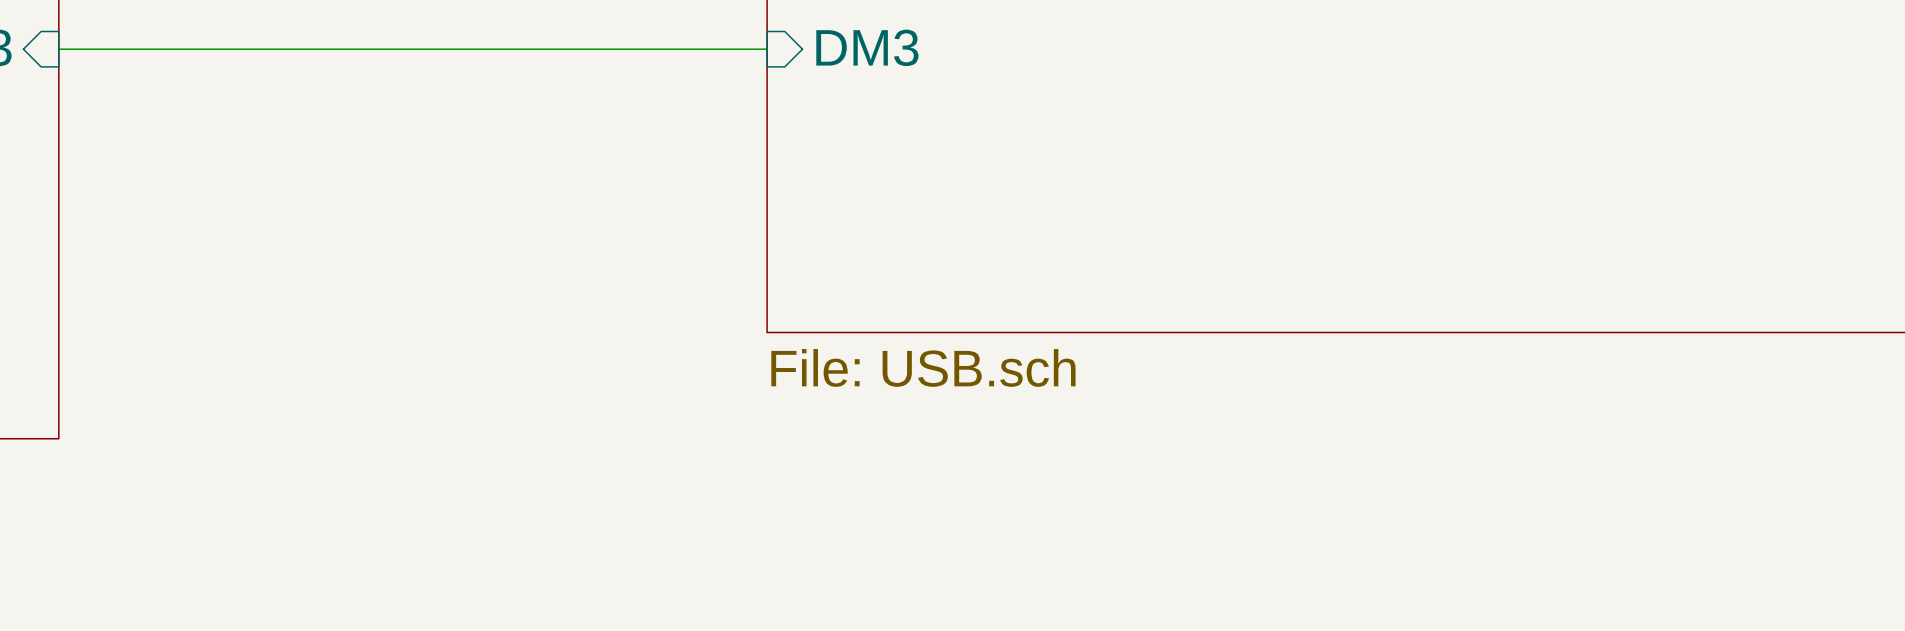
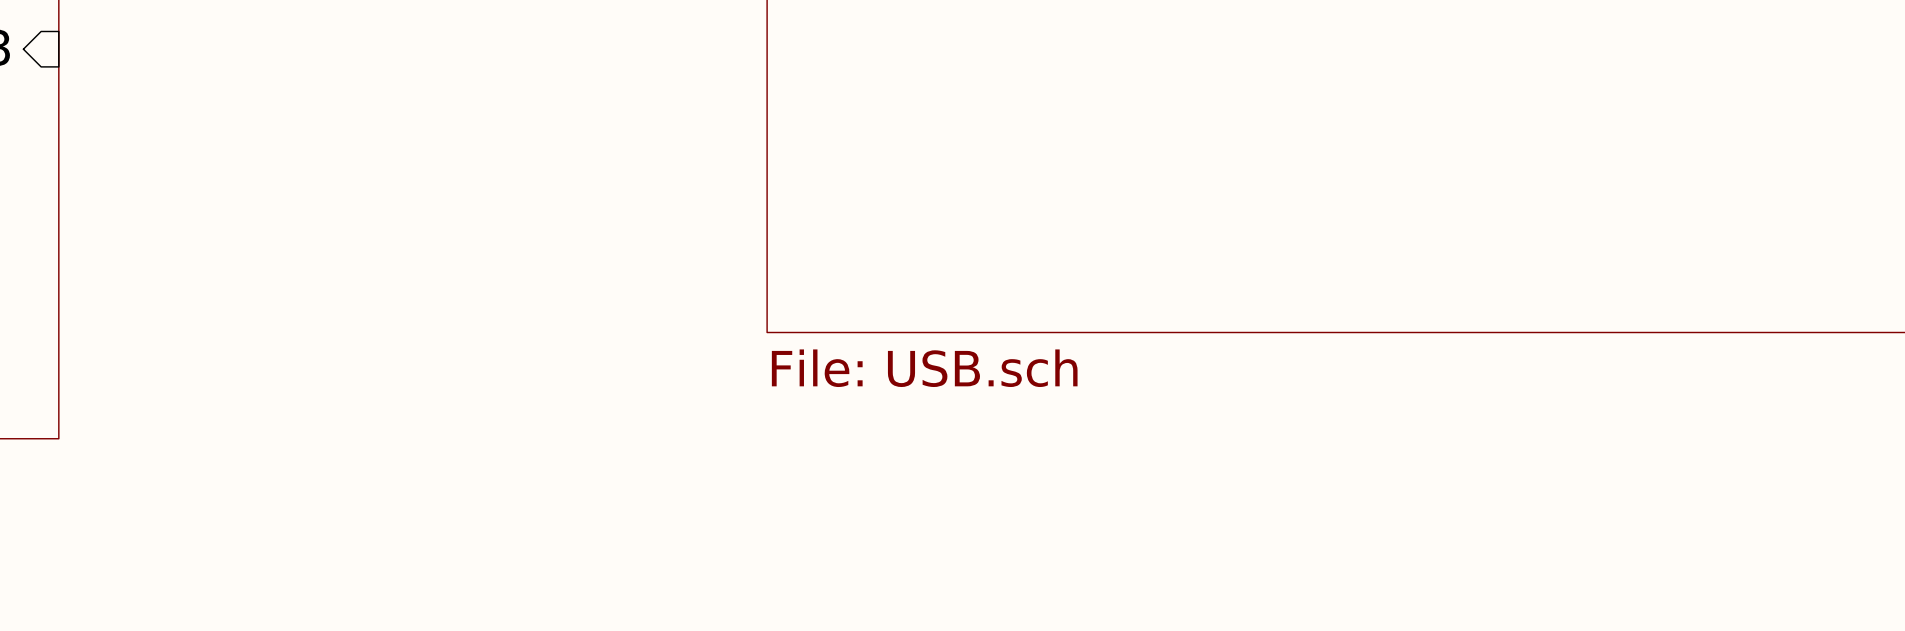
sheet pin: DM3 (867, 47) -> none
wire: (58, 49) (767, 49) -> none

